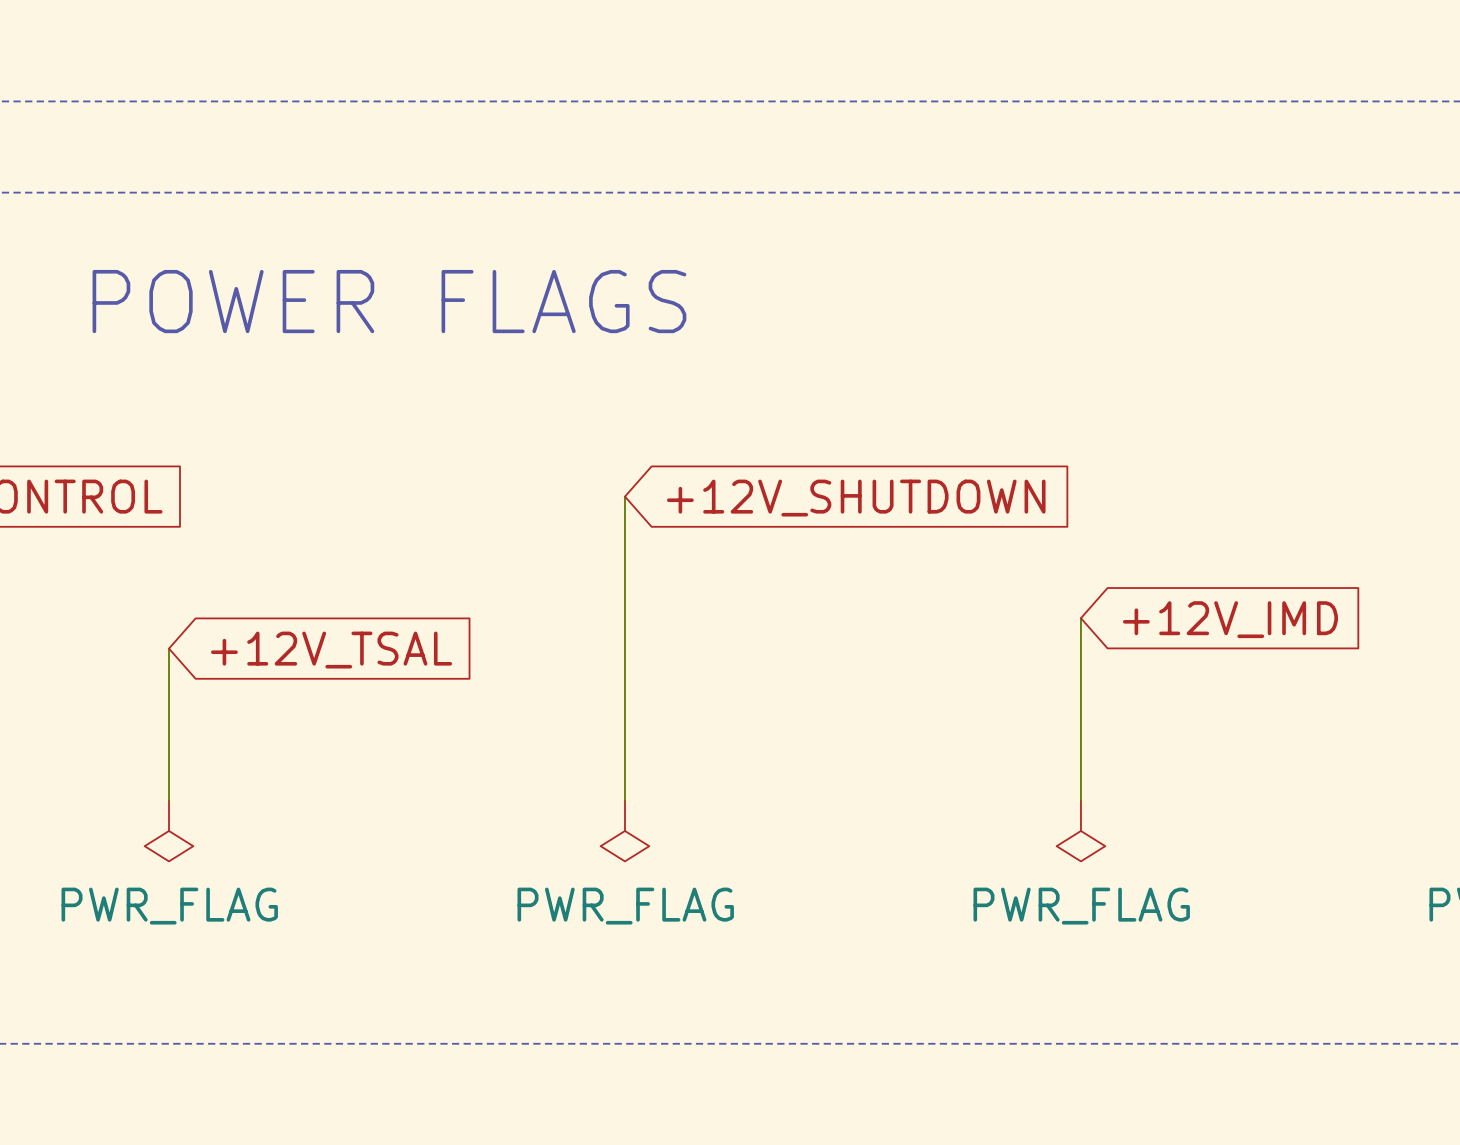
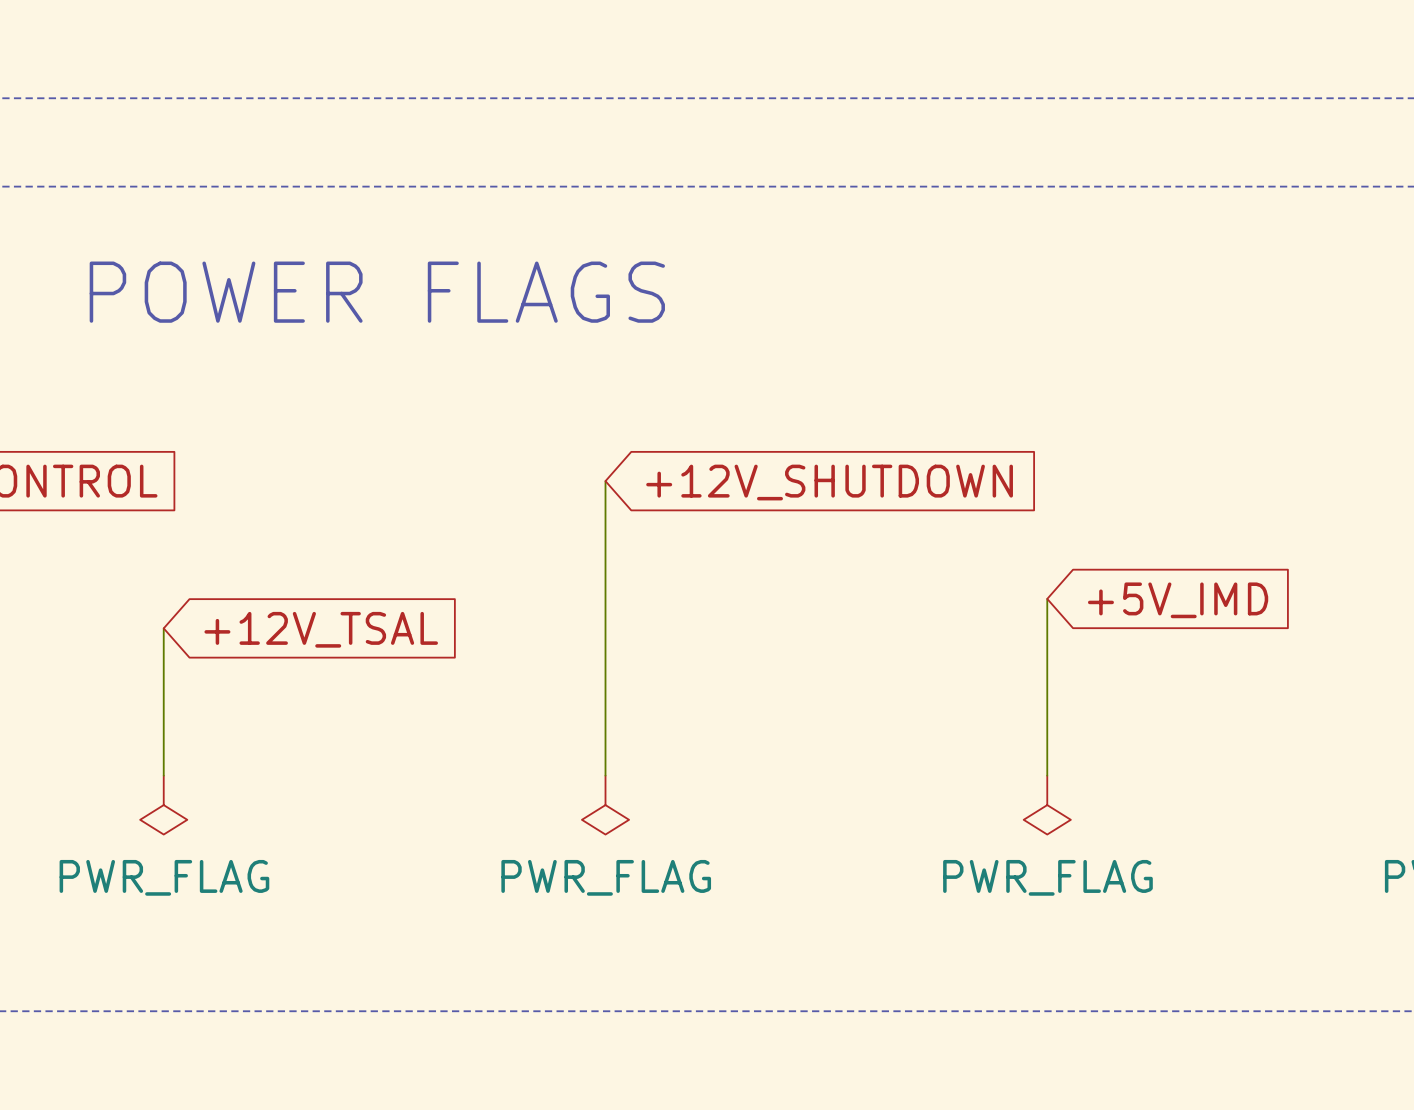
global label: +12V_IMD (1230, 619) -> +5V_IMD (1178, 600)

